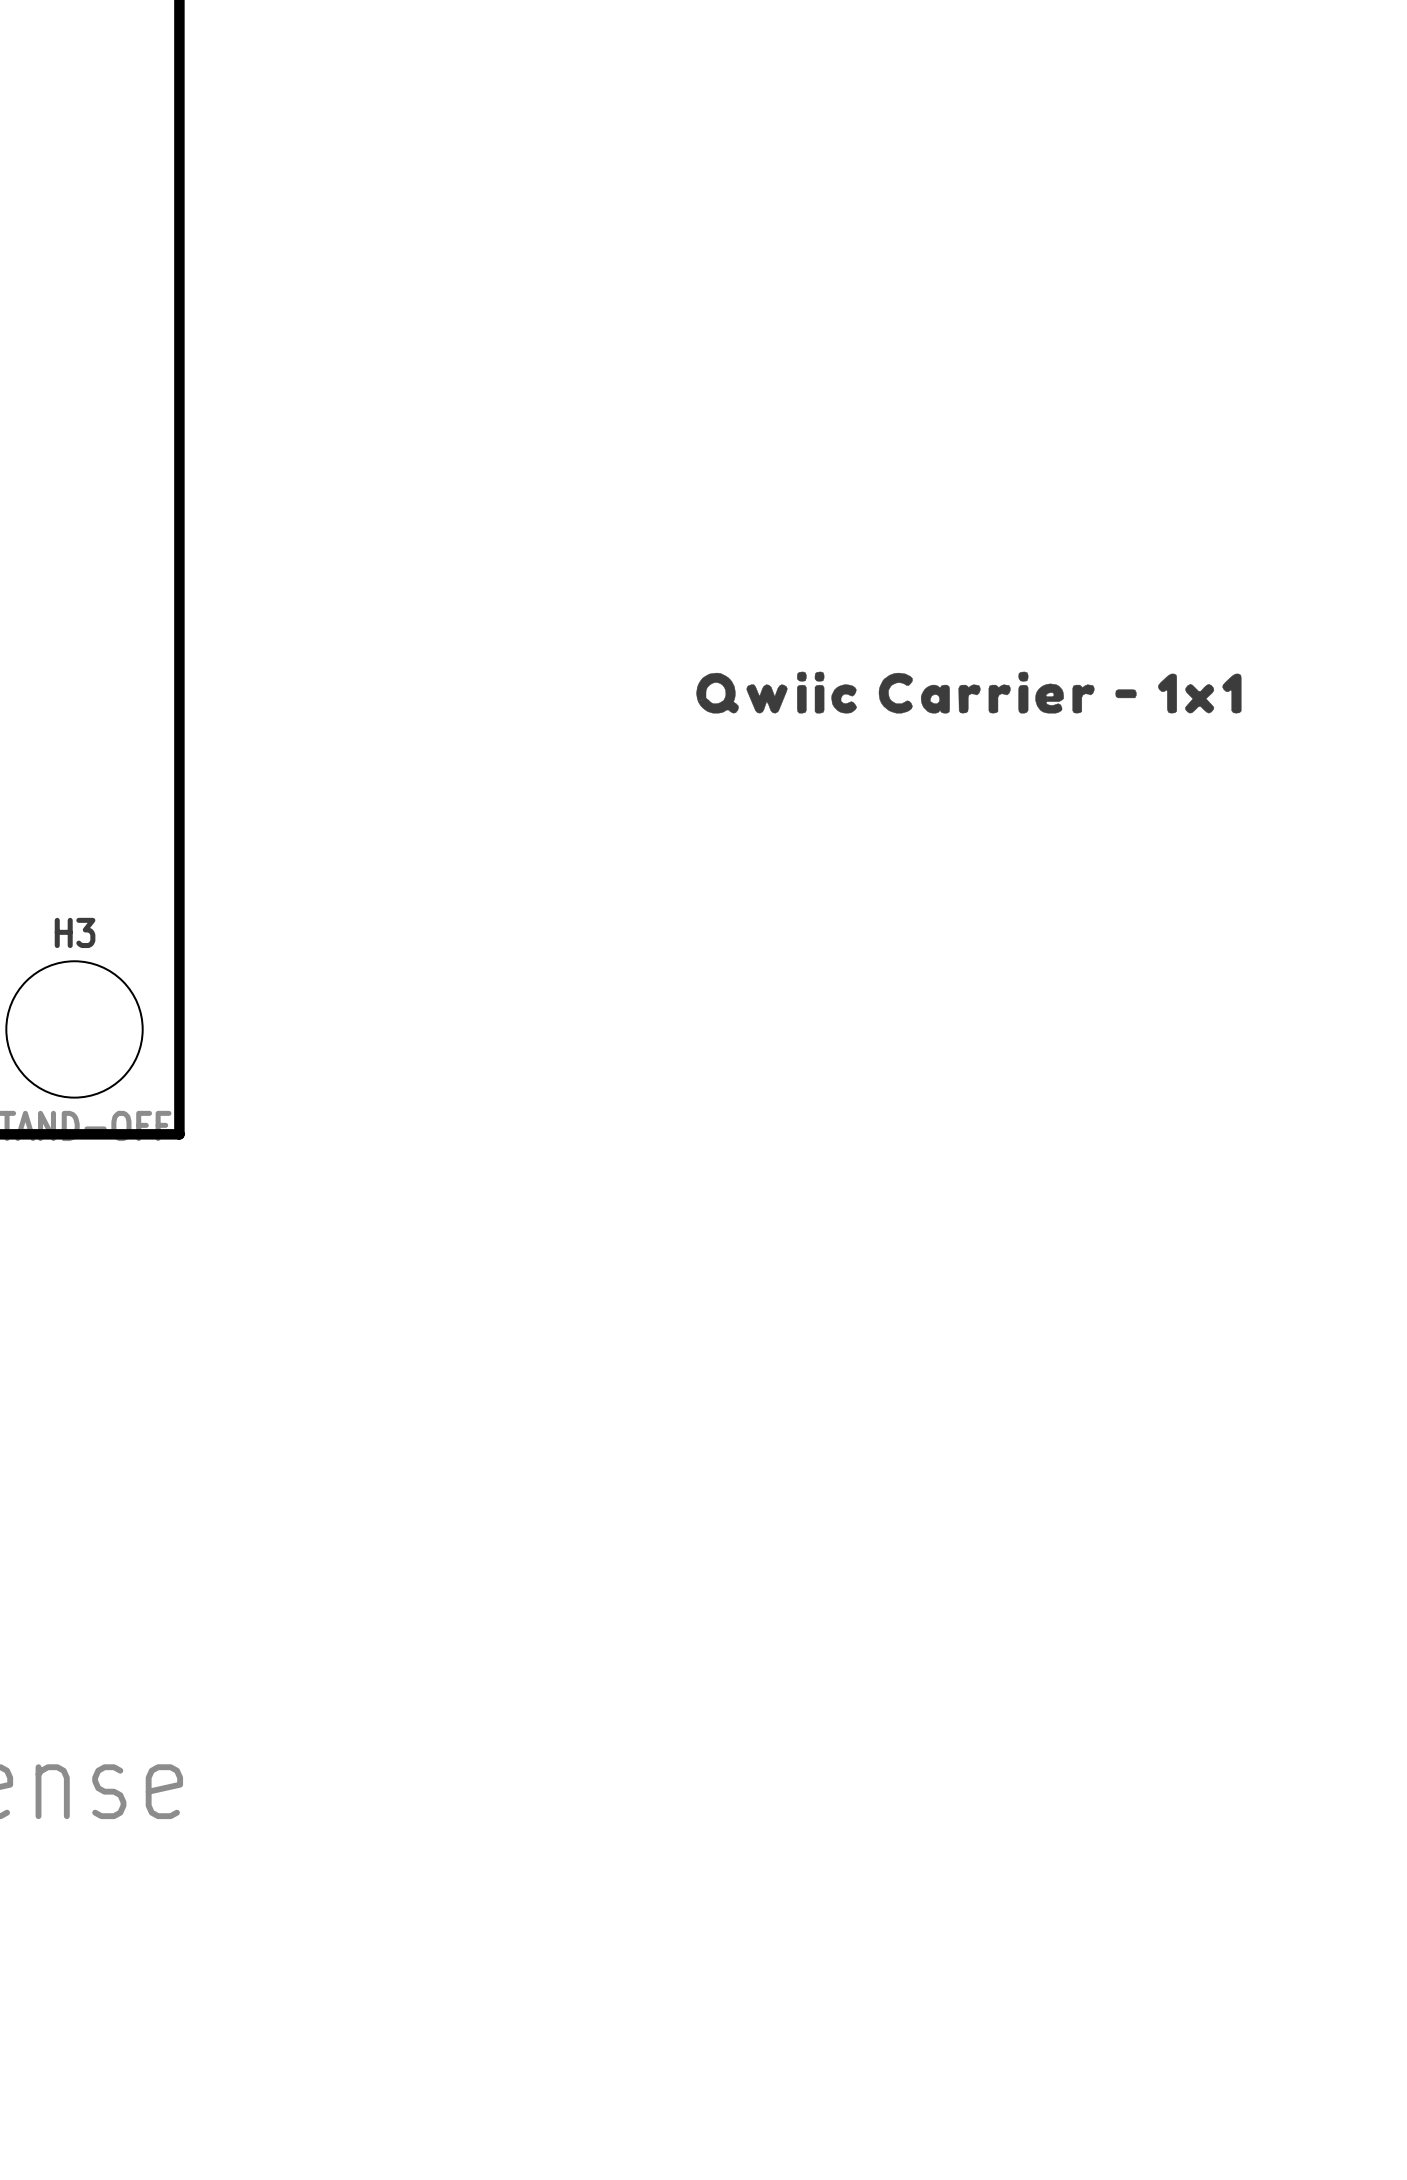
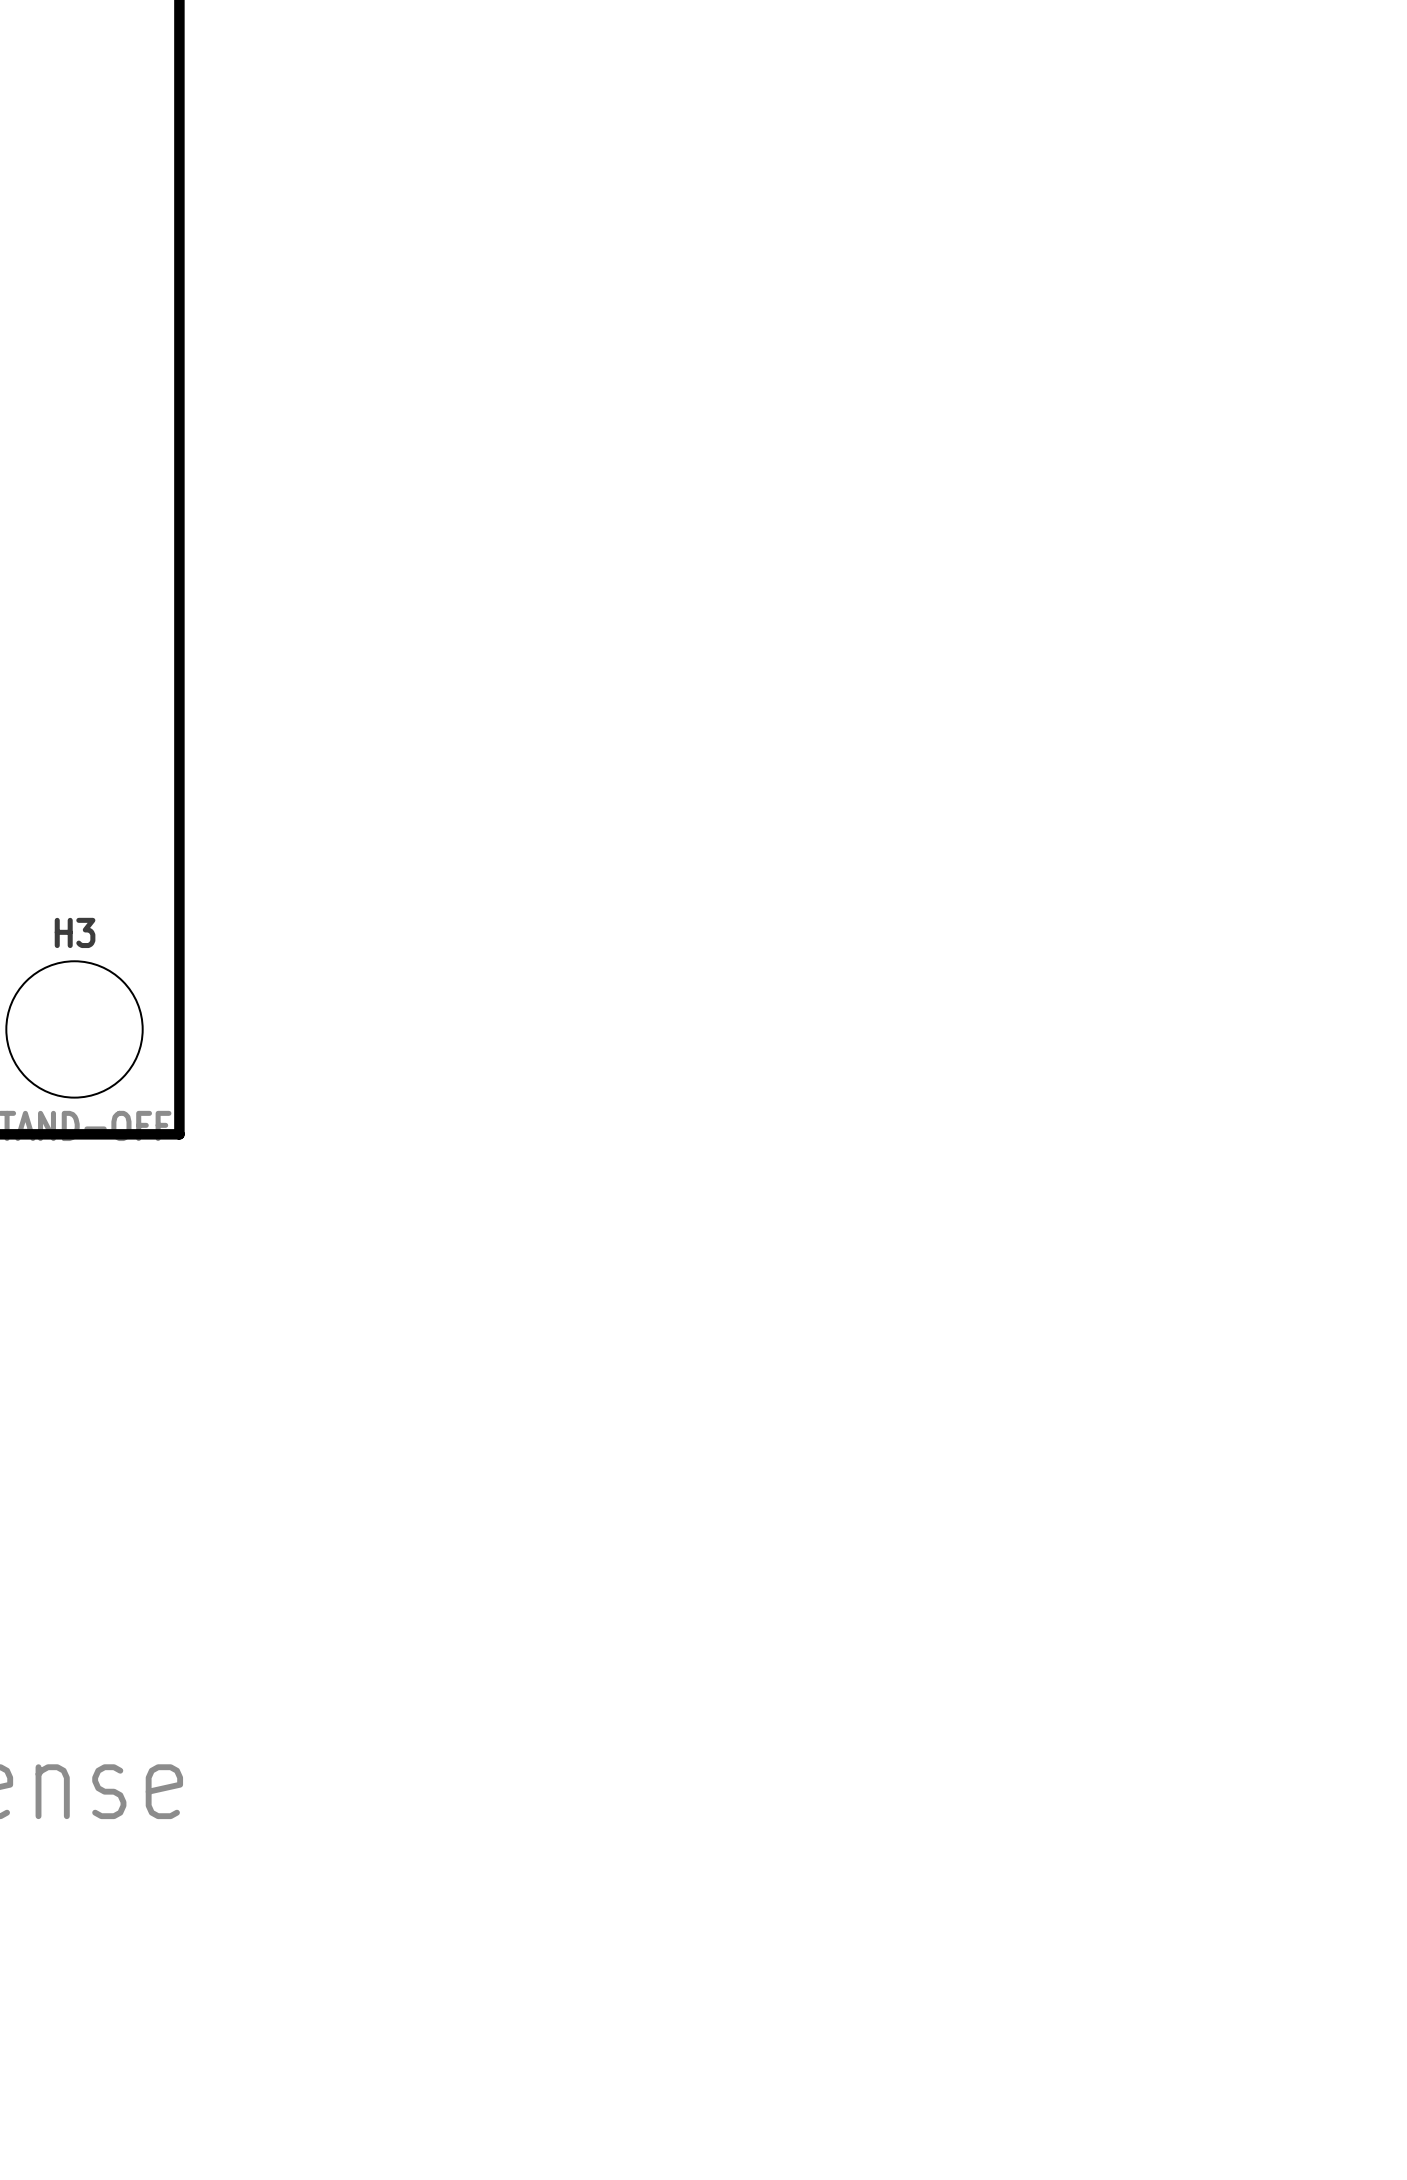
drawing: [696, 671, 1242, 714] -> none

